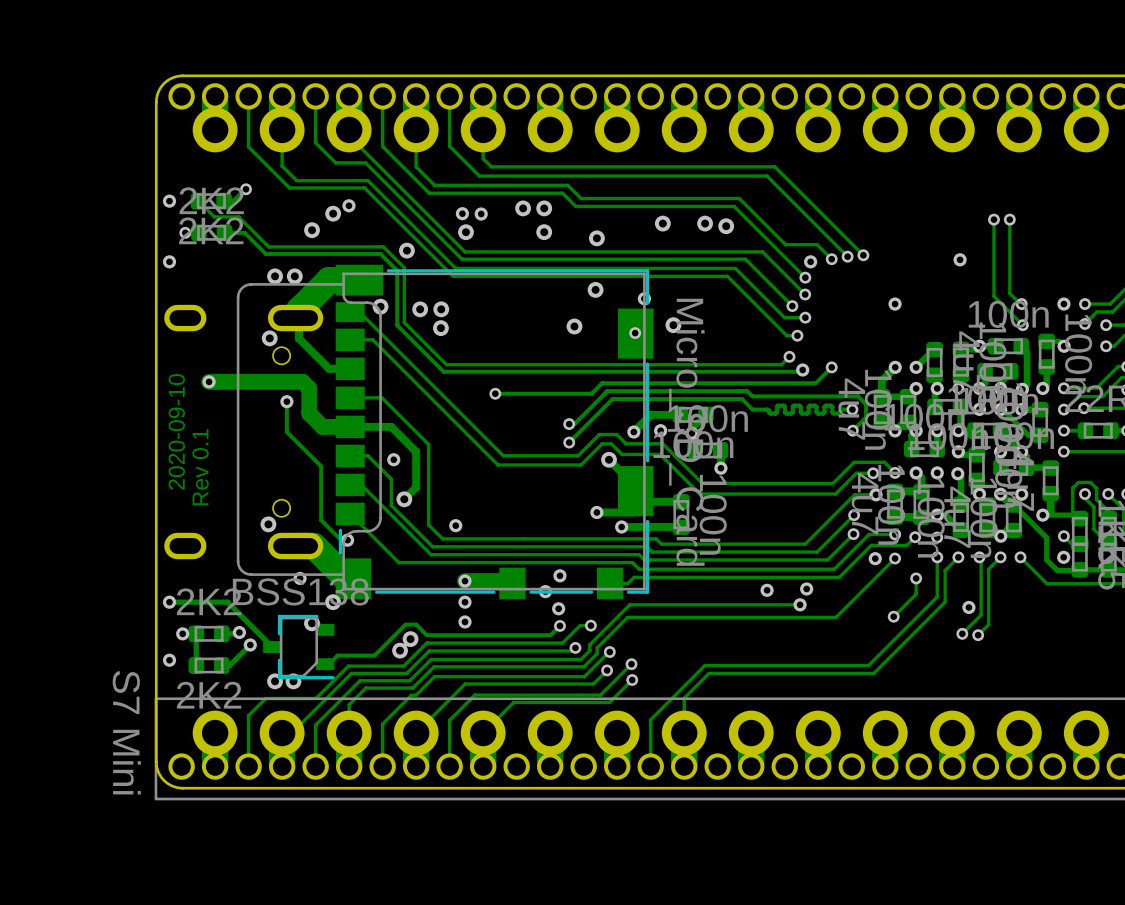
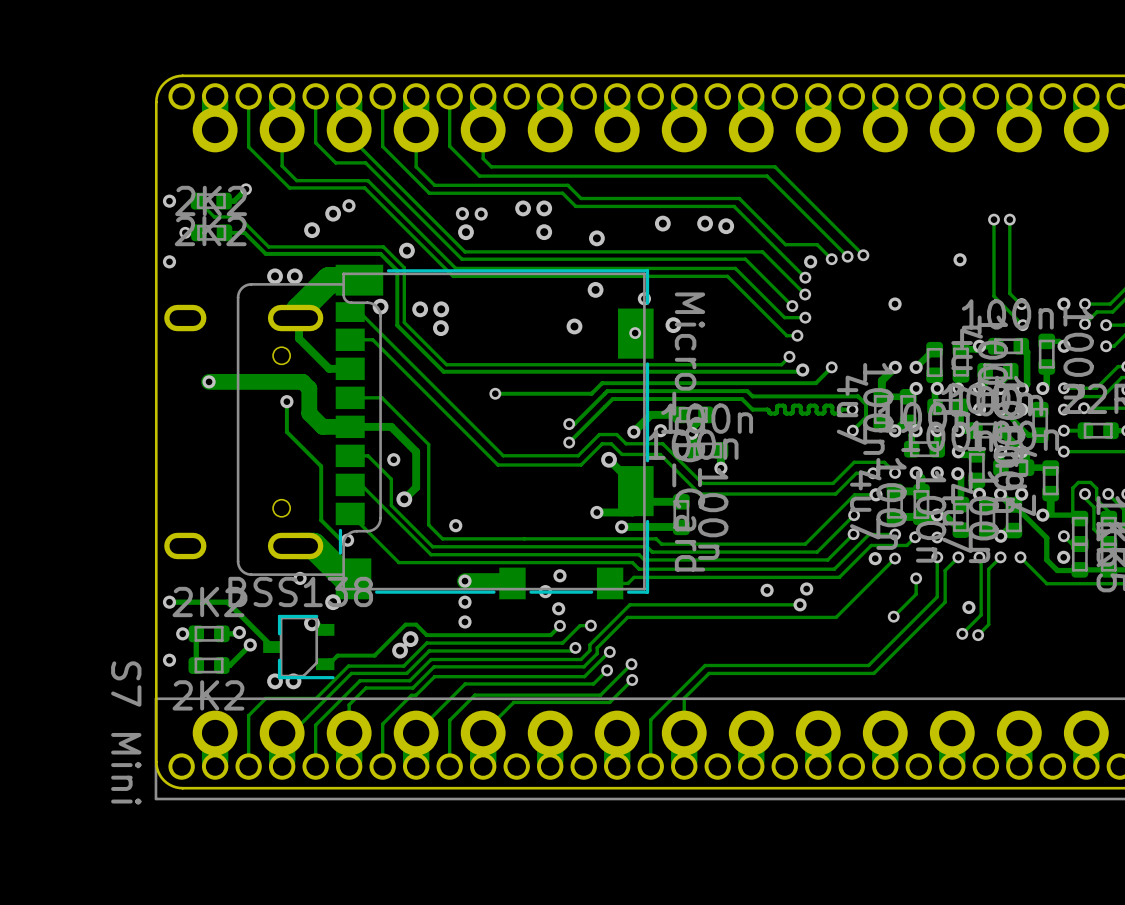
via: (269, 338) -> none
text: 2020-09-10 (176, 431) -> none
text: Rev 0.1 (200, 467) -> none
via: (268, 524) -> none

